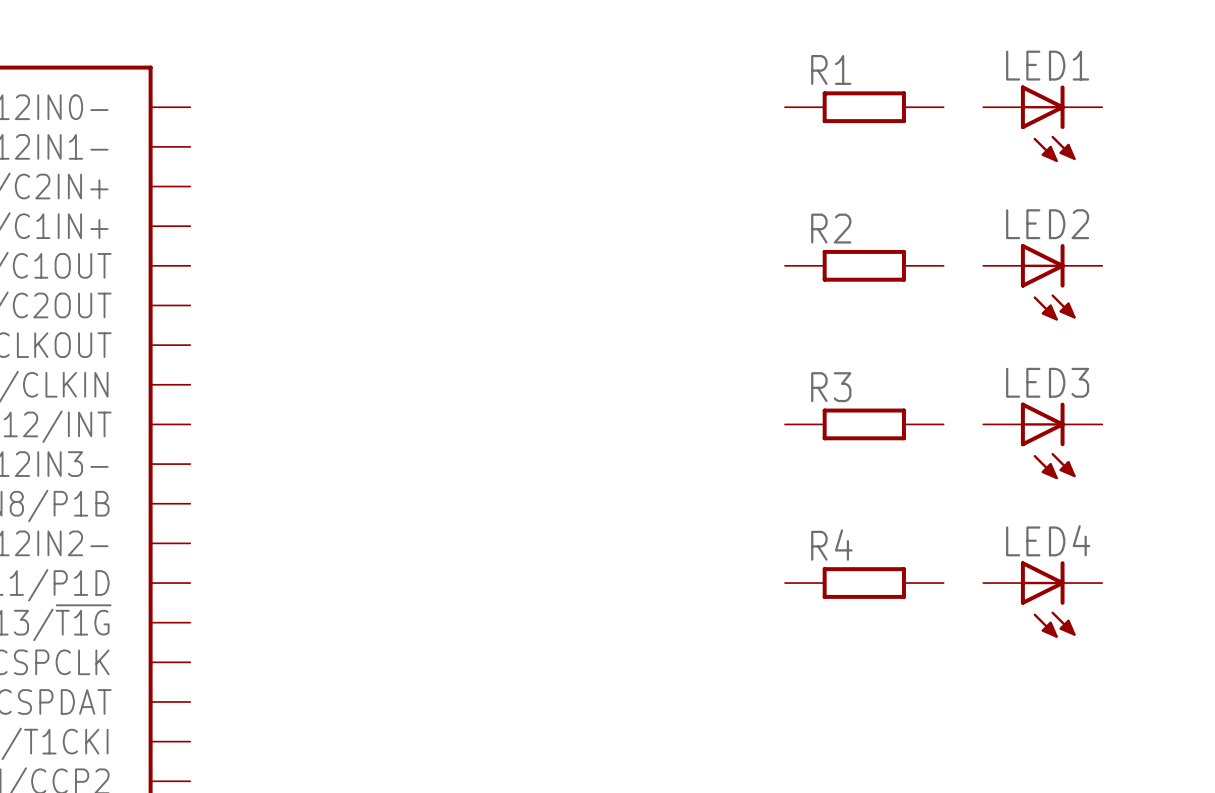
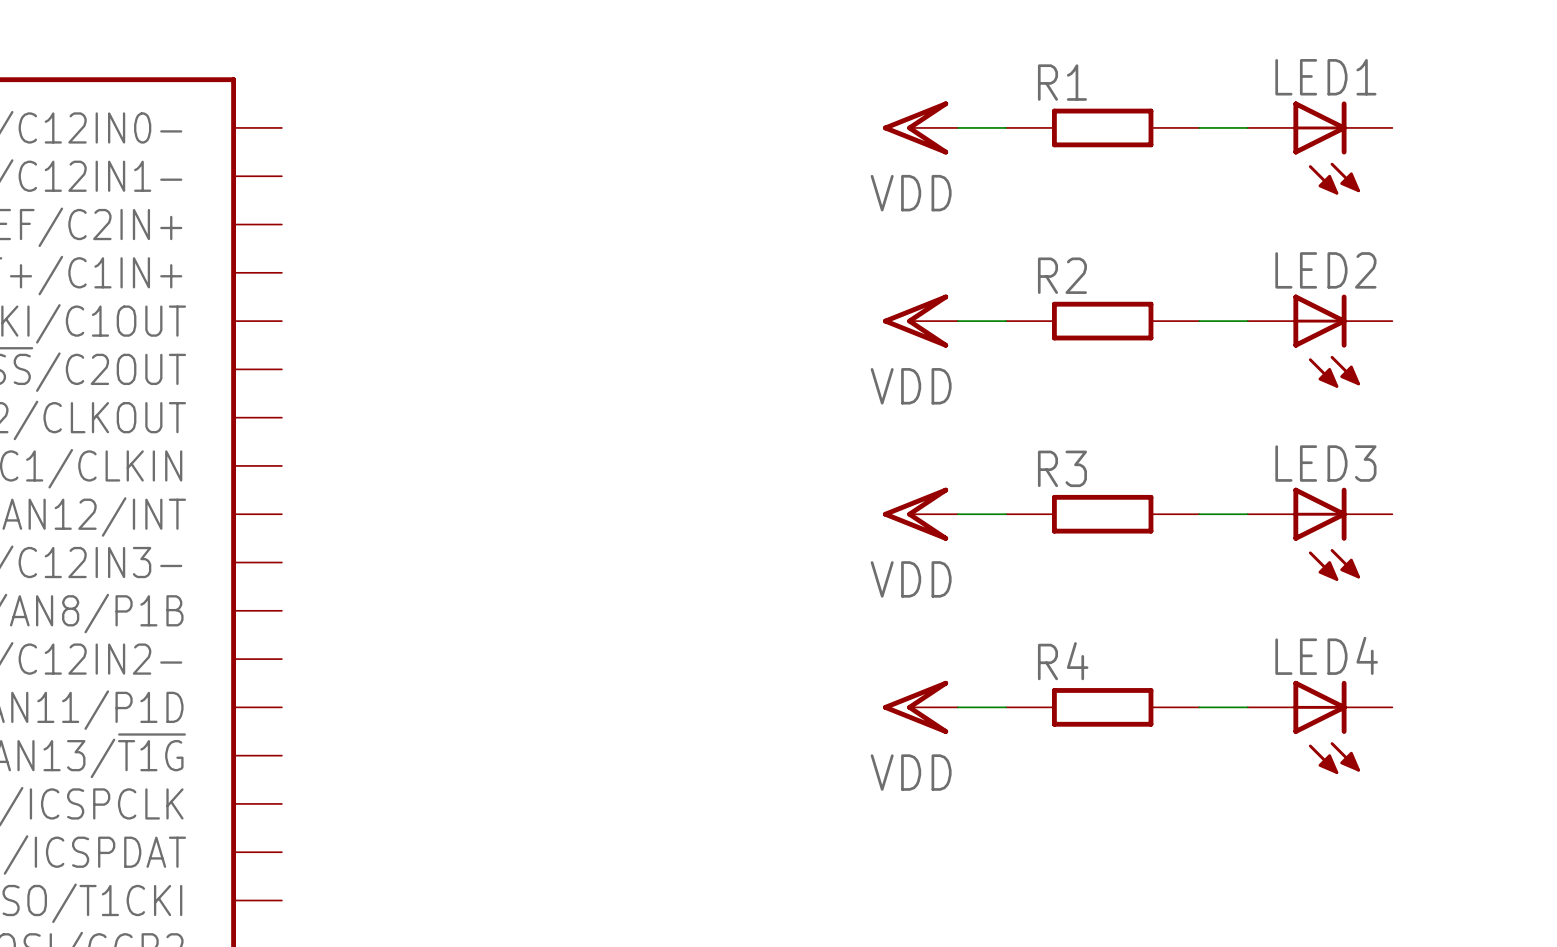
power symbol: none -> VDD (920, 127)
wire: none -> (957, 127) (1006, 127)
wire: none -> (1199, 127) (1247, 127)
power symbol: none -> VDD (920, 321)
wire: none -> (957, 321) (1006, 321)
wire: none -> (1199, 321) (1247, 321)
power symbol: none -> VDD (920, 514)
wire: none -> (957, 514) (1006, 514)
wire: none -> (1199, 514) (1247, 514)
power symbol: none -> VDD (920, 707)
wire: none -> (957, 707) (1006, 707)
wire: none -> (1199, 707) (1247, 707)

